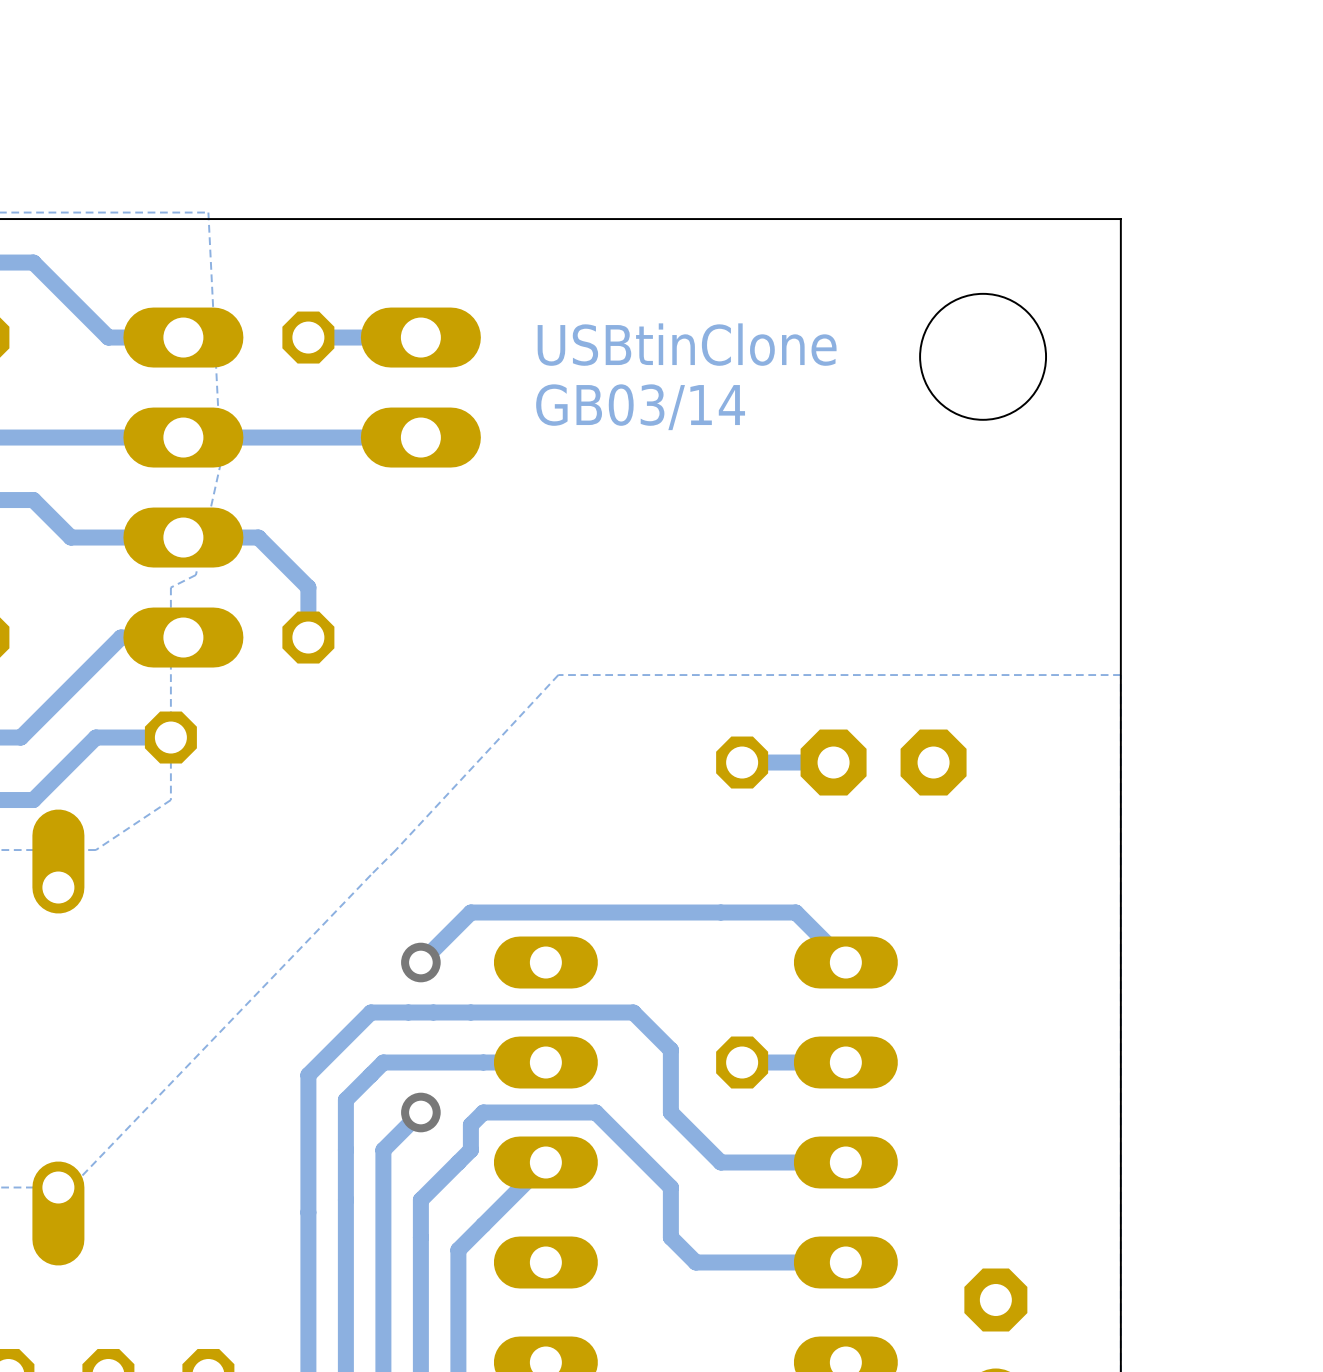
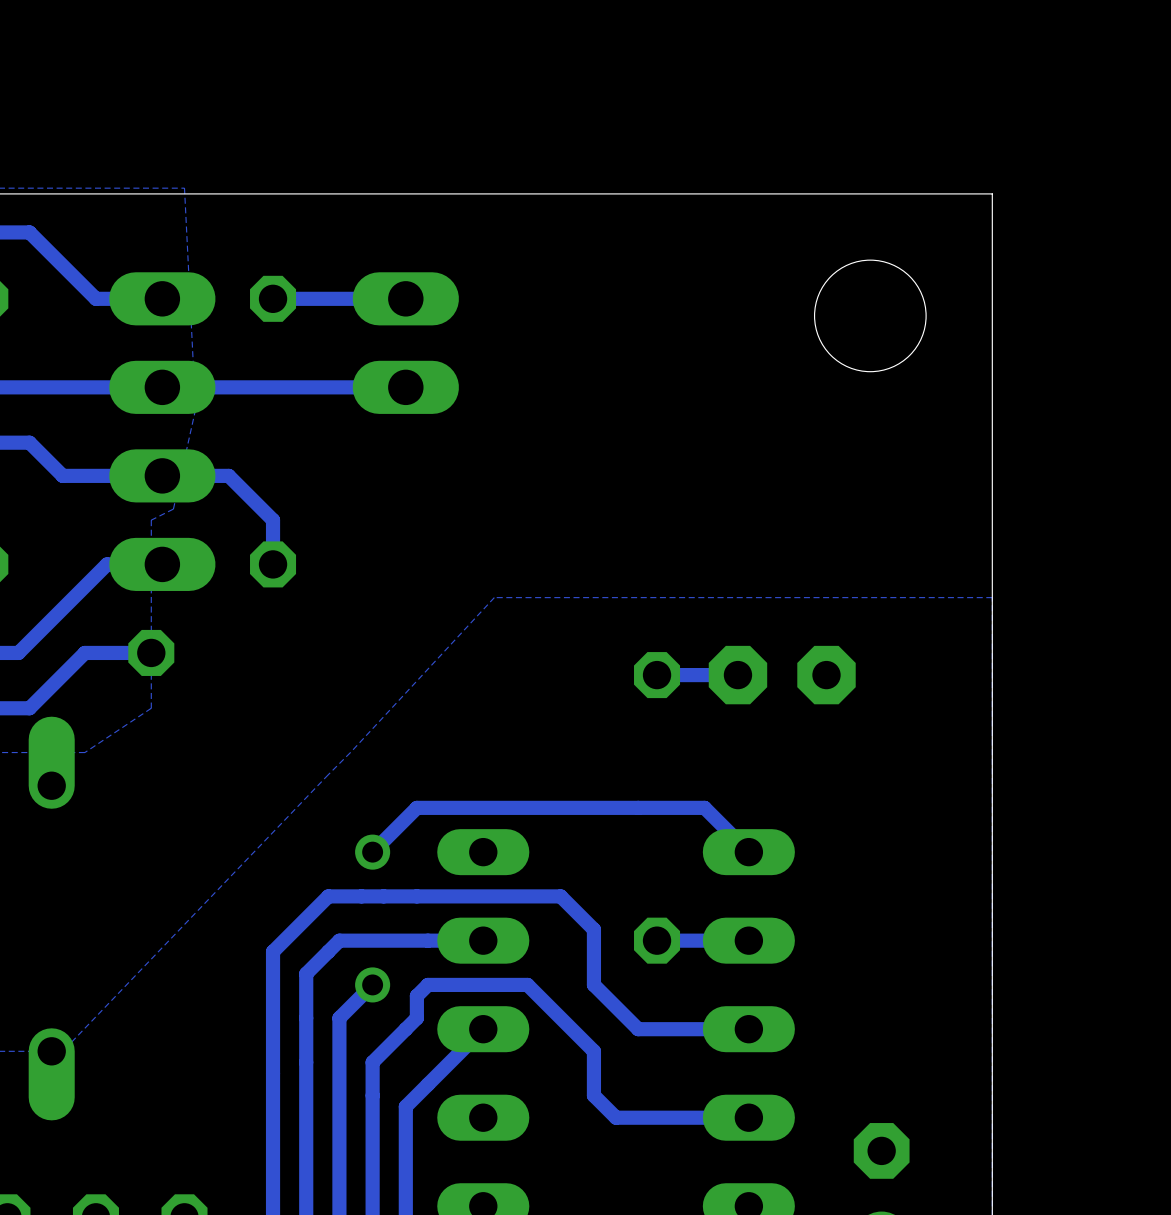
text: USBtinClone (687, 344) -> none
part position: (420, 387) -> (405, 343)
text: GB03/14 (640, 407) -> none

